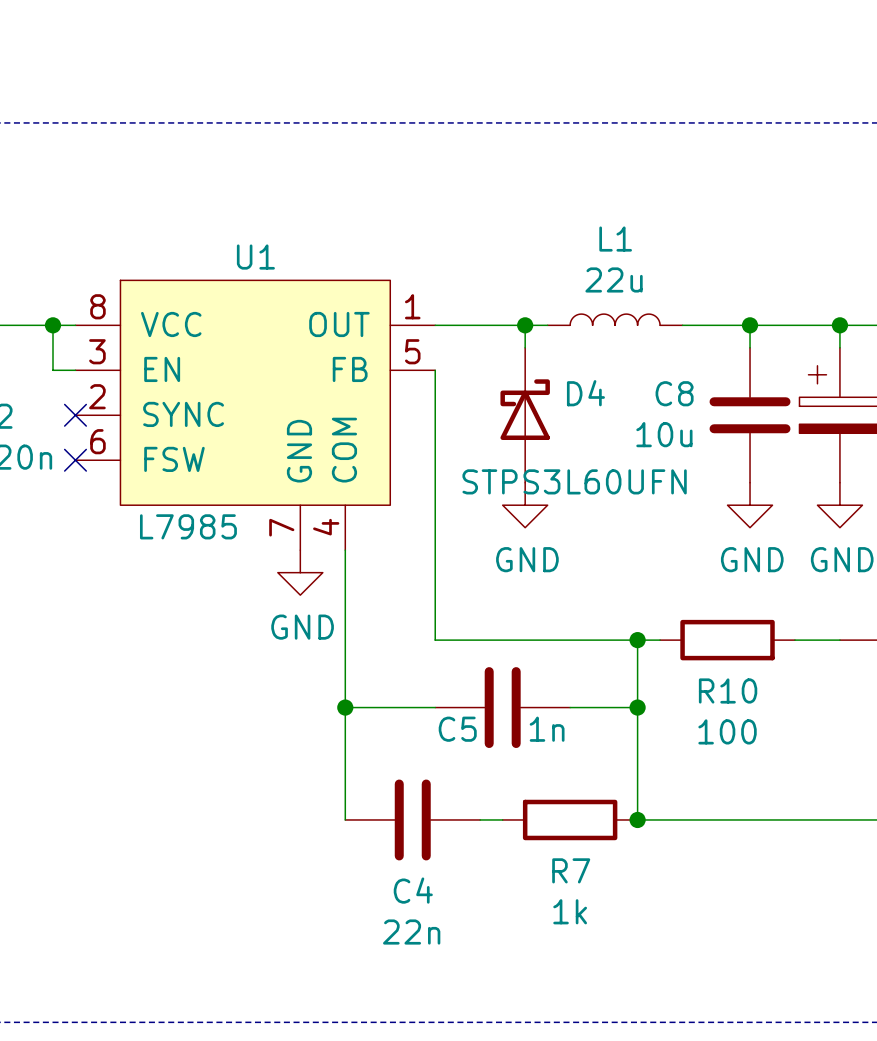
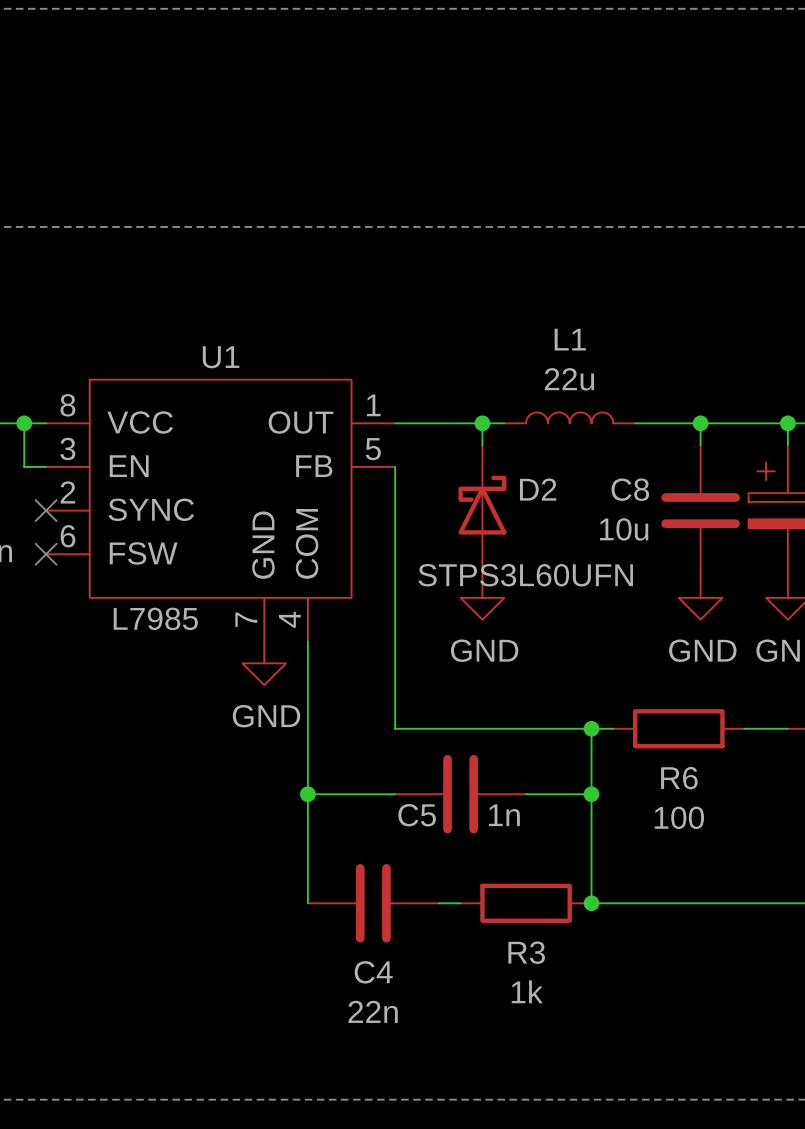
D4 name: D4 (585, 393) -> D2 (538, 489)
R10 name: R10 (728, 690) -> R6 (679, 778)
R7 name: R7 (571, 870) -> R3 (526, 952)

